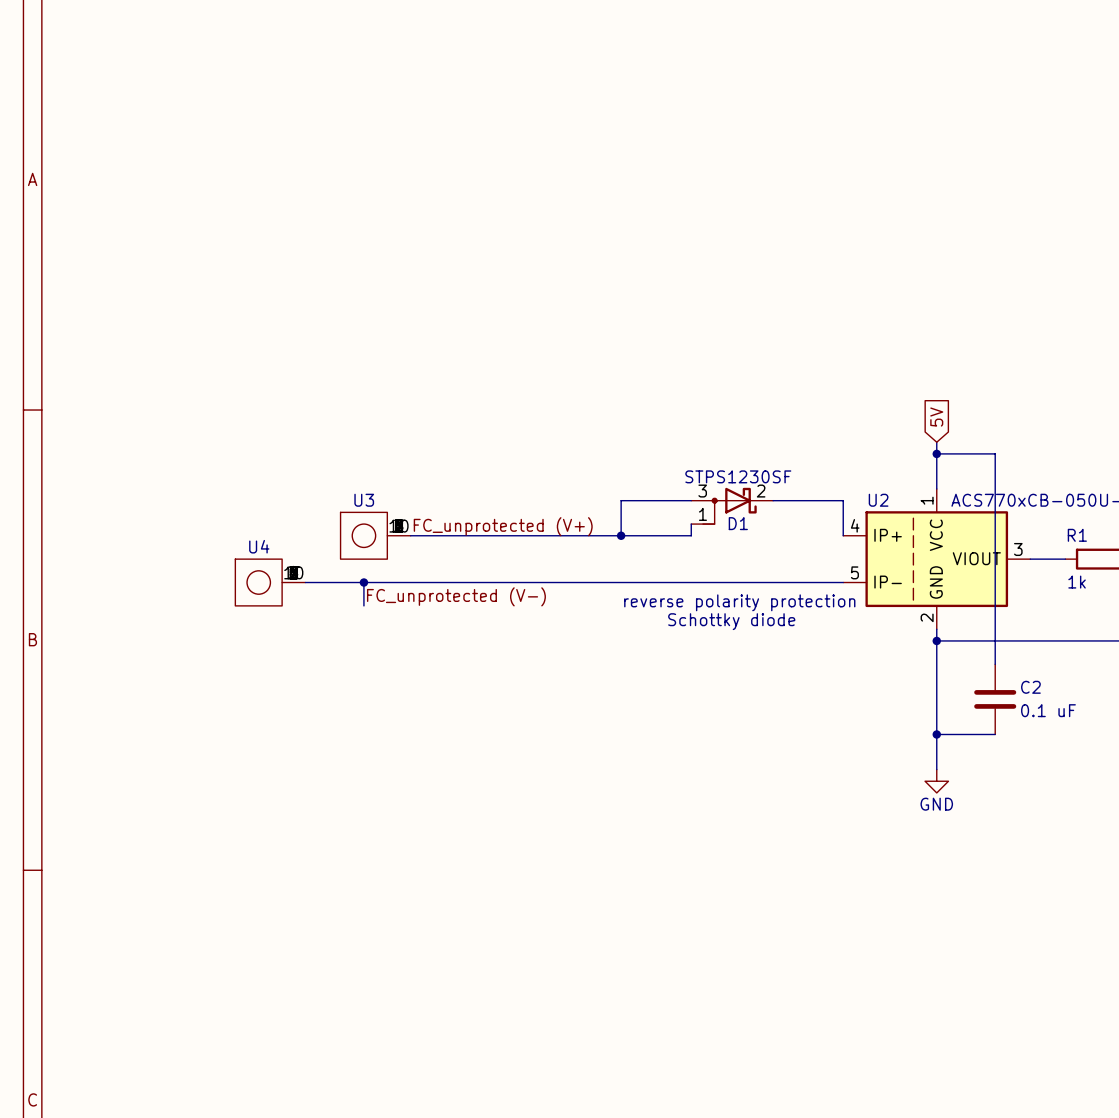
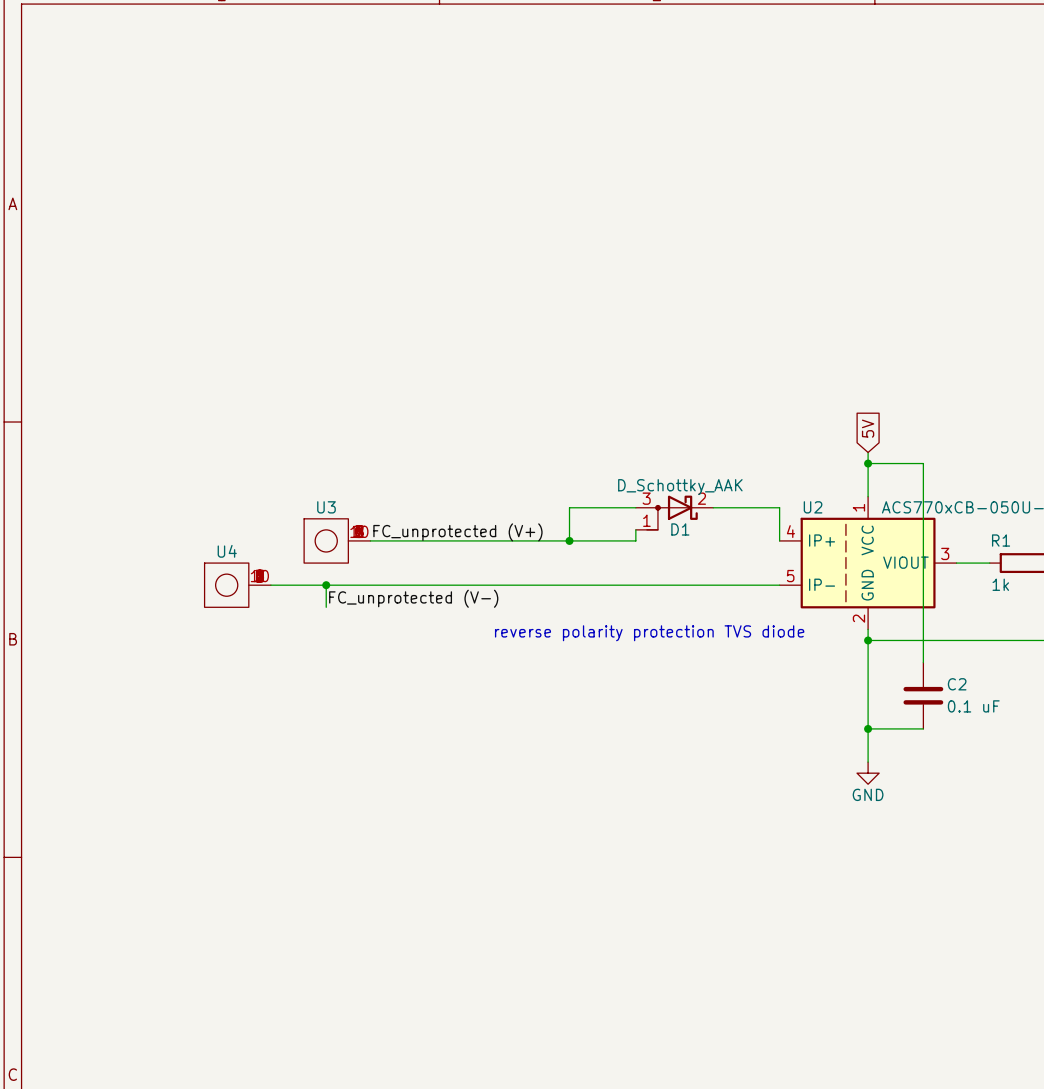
D1 value: STPS1230SF (738, 476) -> D_Schottky_AAK (680, 487)
text: reverse polarity protection (739, 602) -> none
text: Schottky diode (731, 621) -> none
text: none -> reverse polarity protection TVS diode (649, 633)

